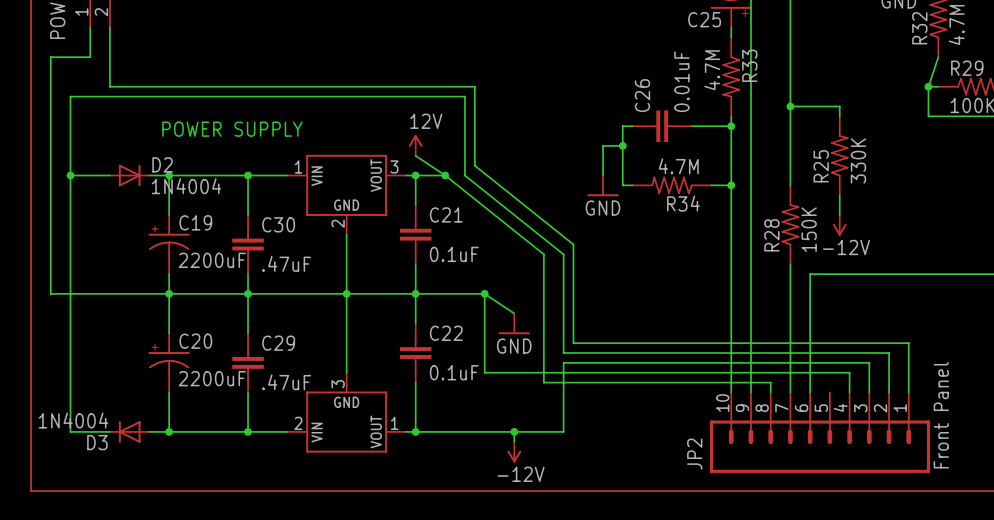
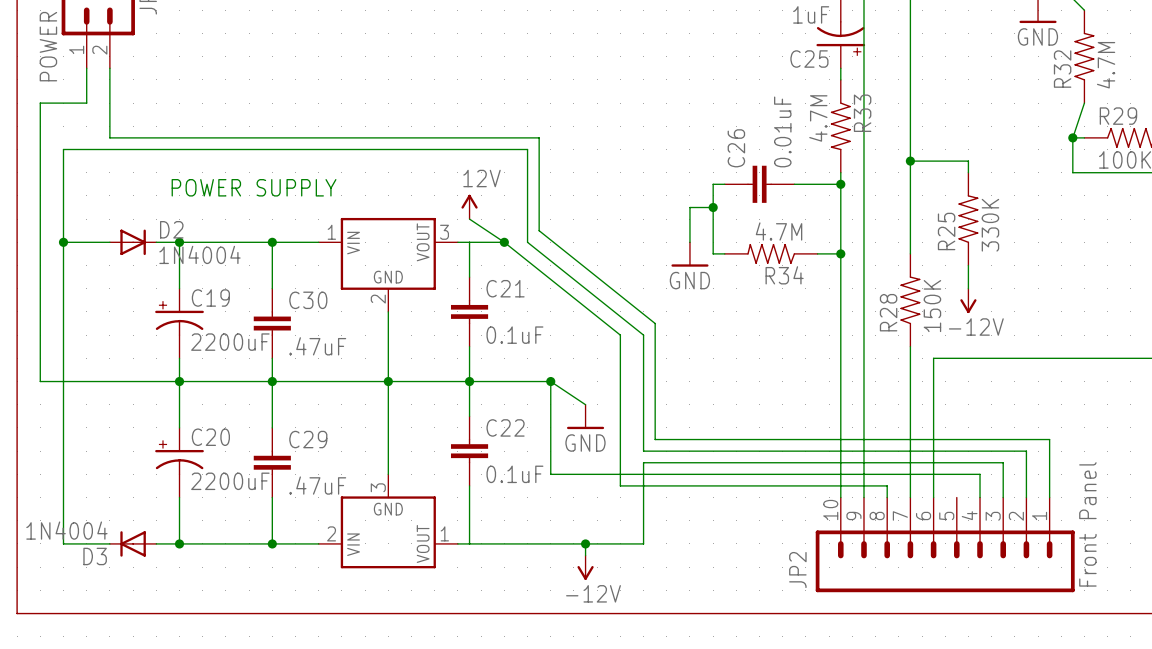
junction: (415, 175) -> none
junction: (415, 431) -> none

